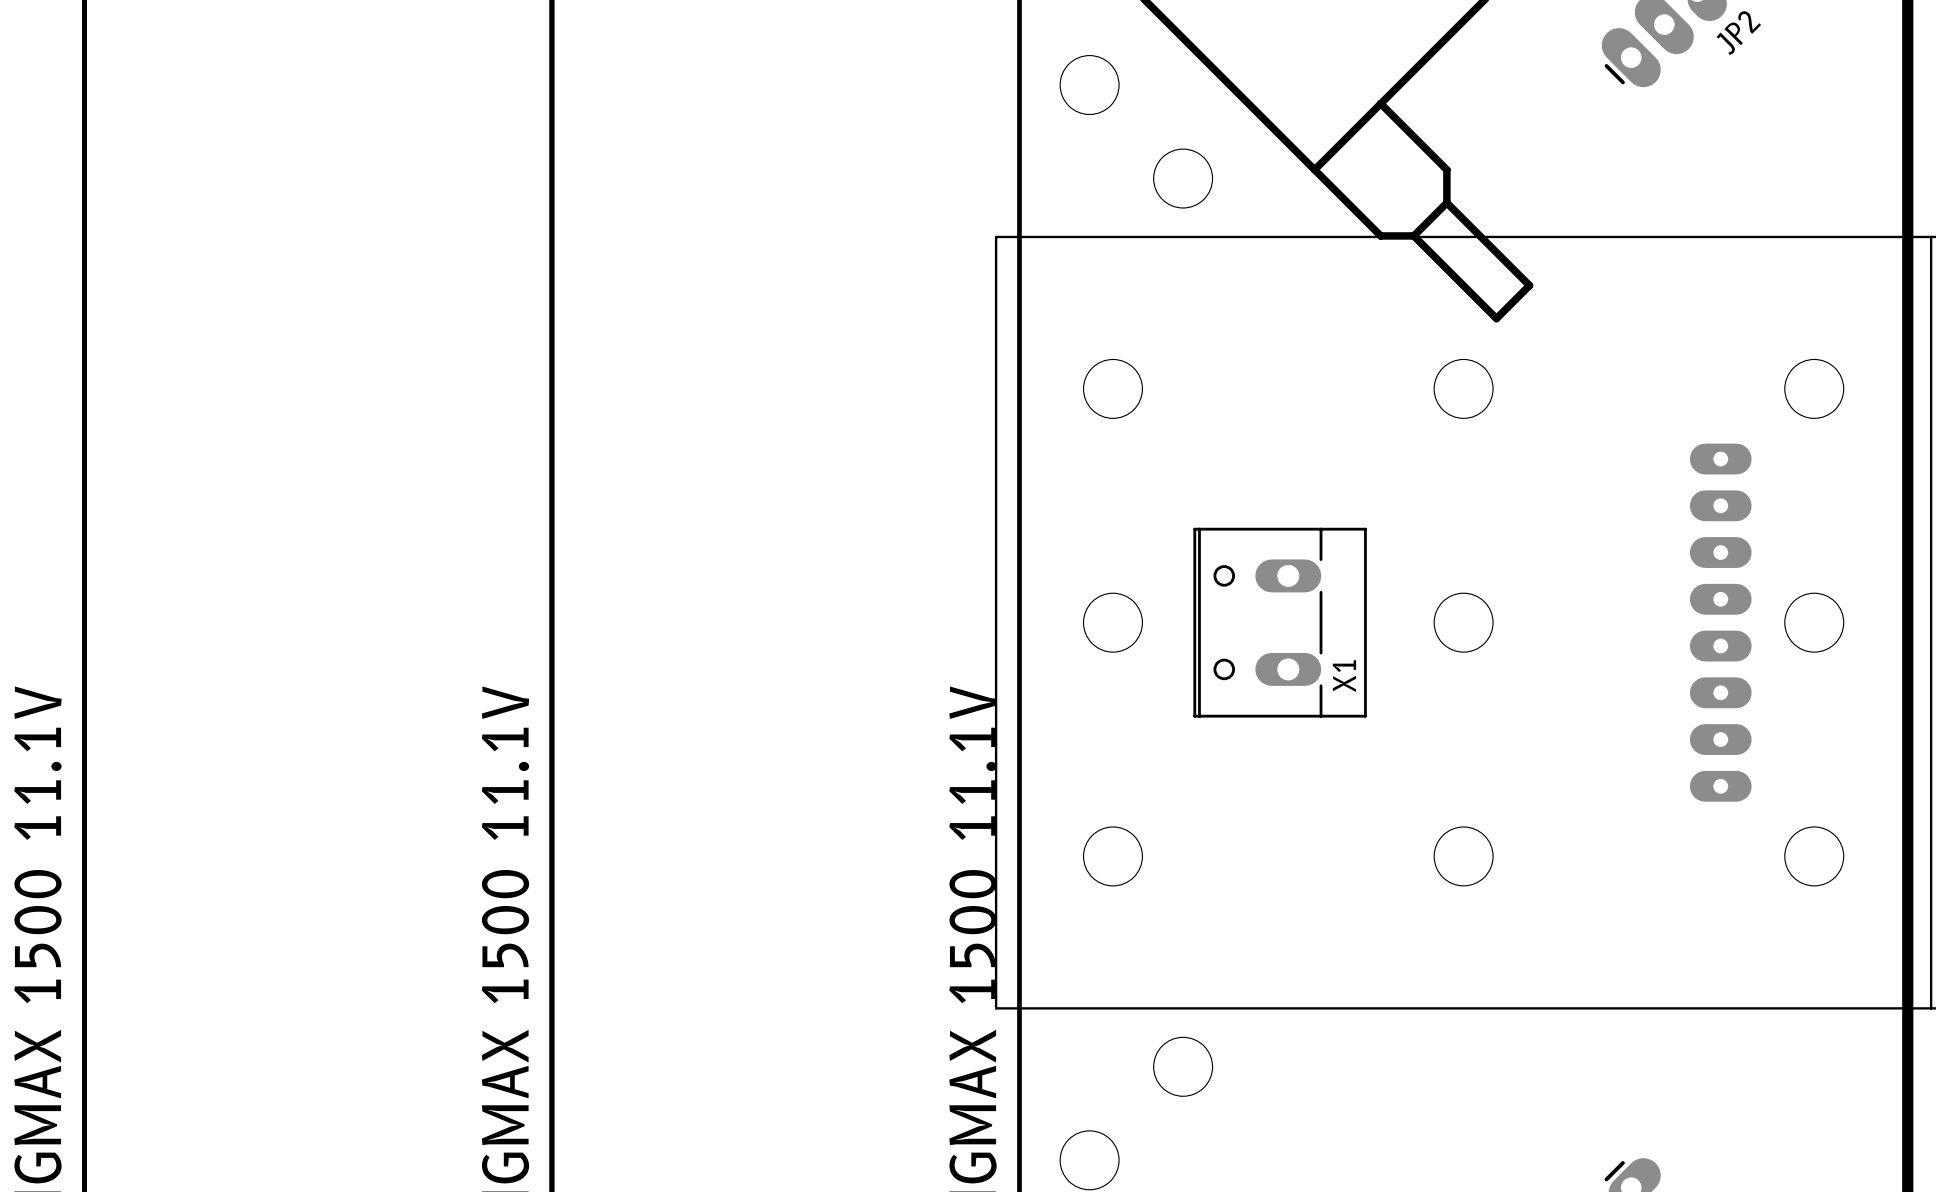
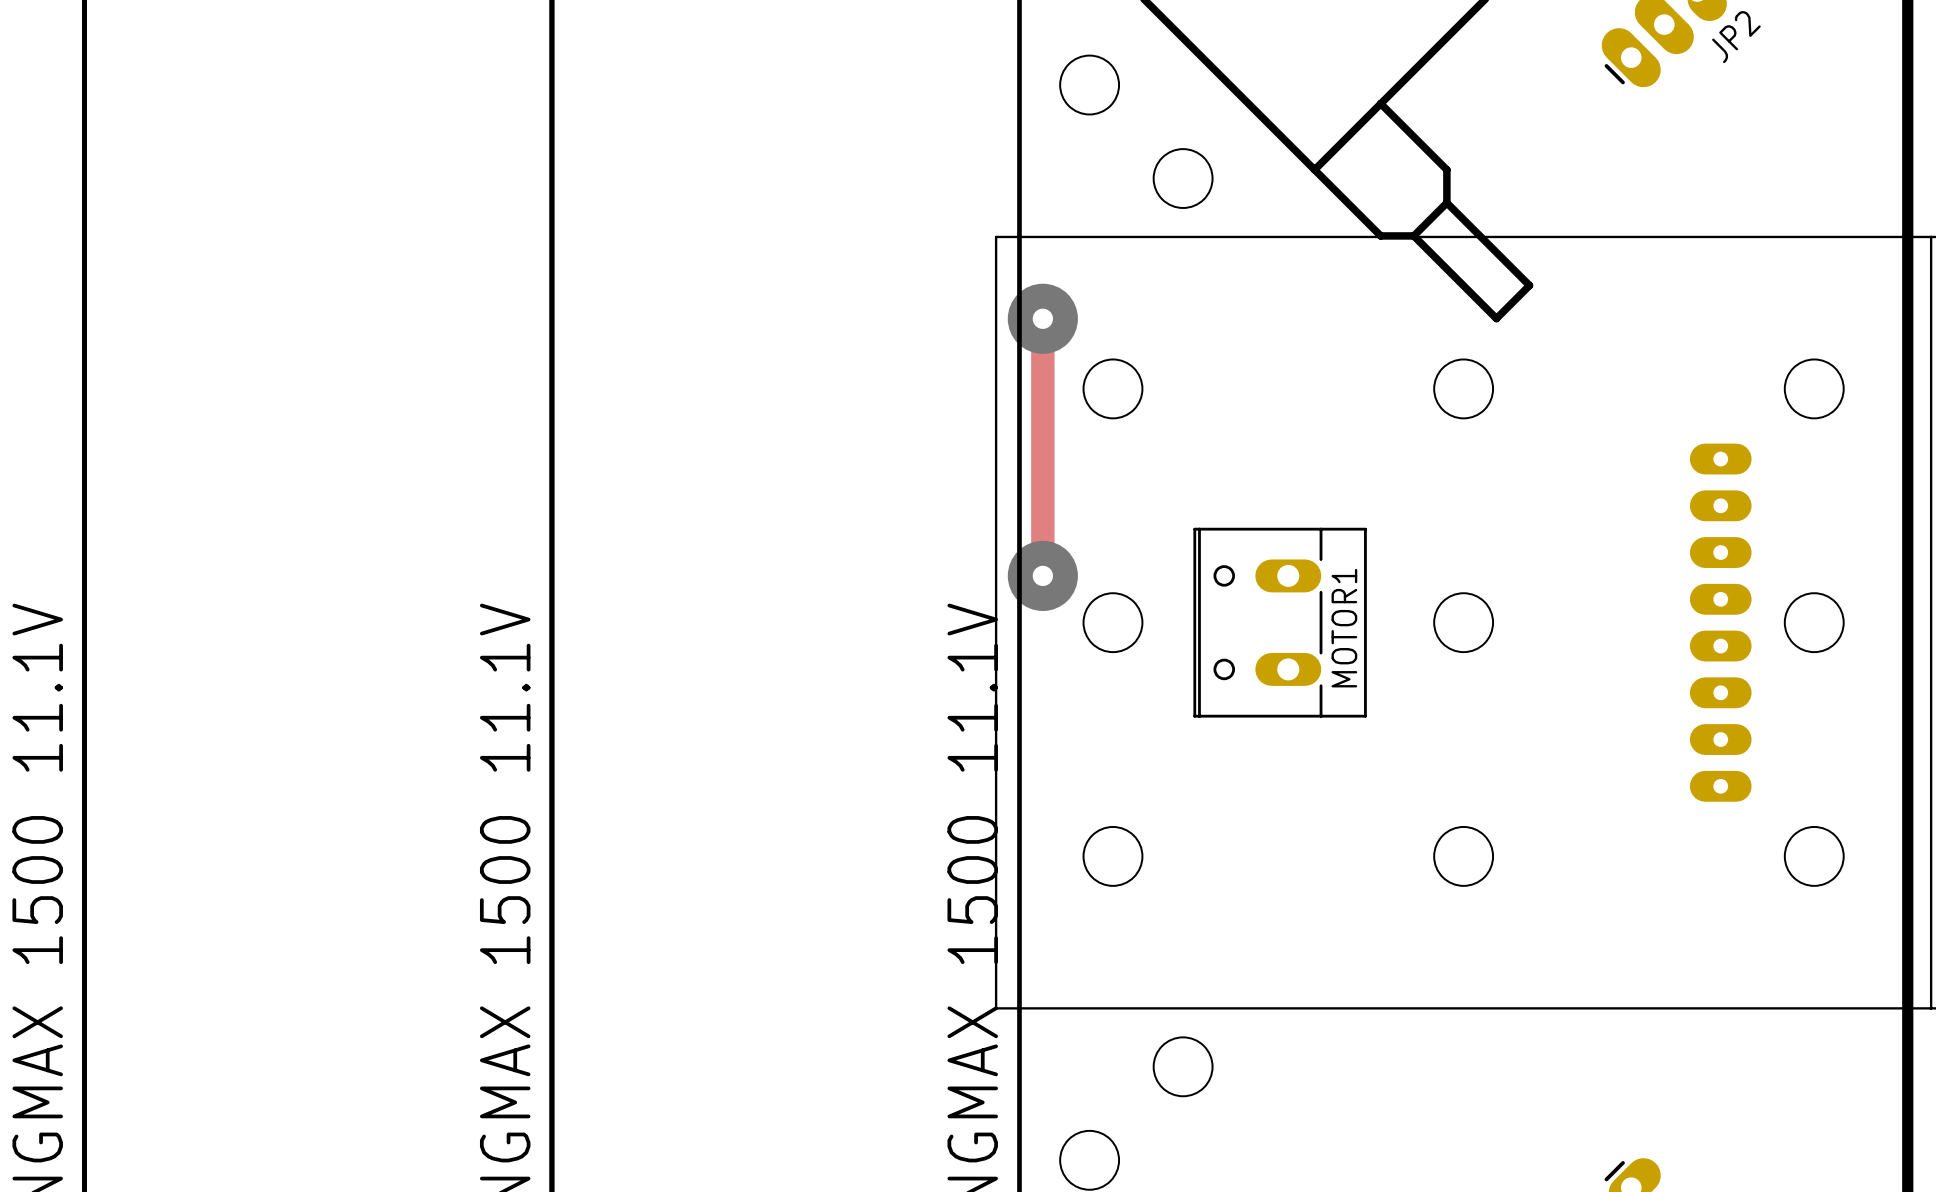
track: none -> (1042, 318) (1042, 575)
via: none -> (1042, 318)
via: none -> (1042, 575)
X1 name: X1 (1344, 676) -> MOTOR1 (1344, 628)

